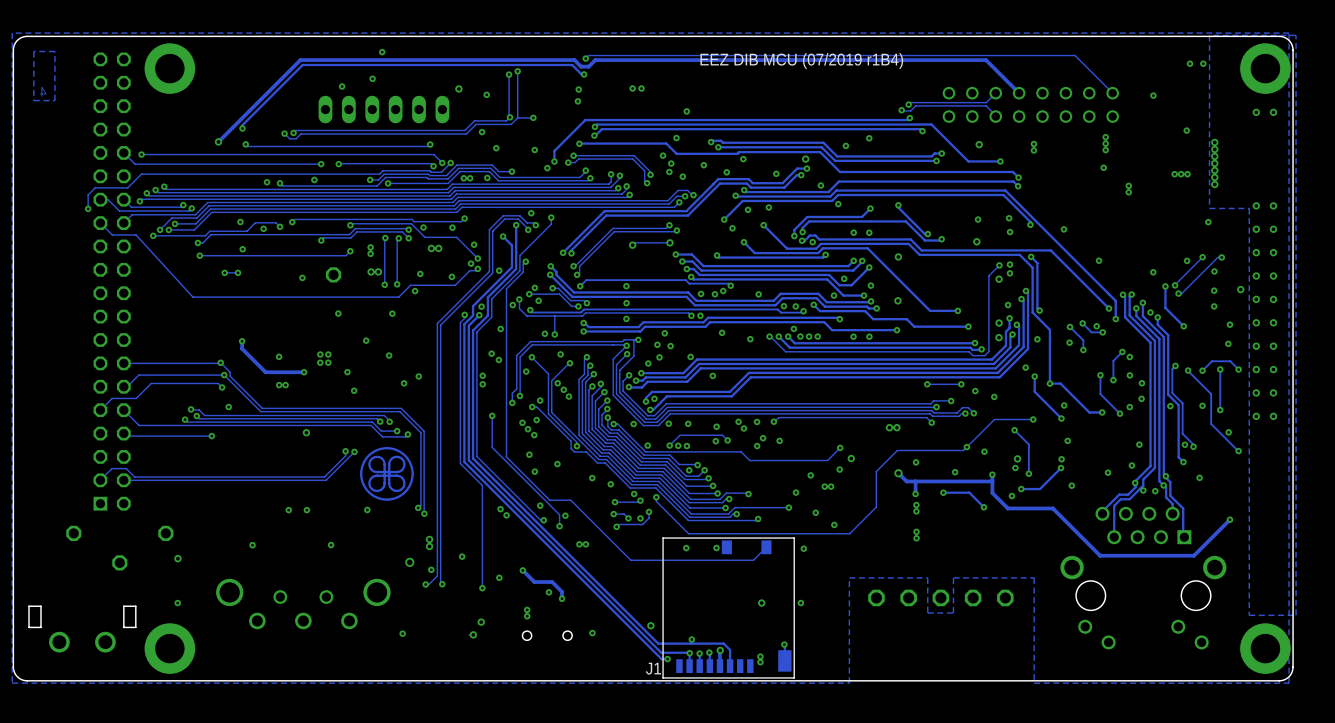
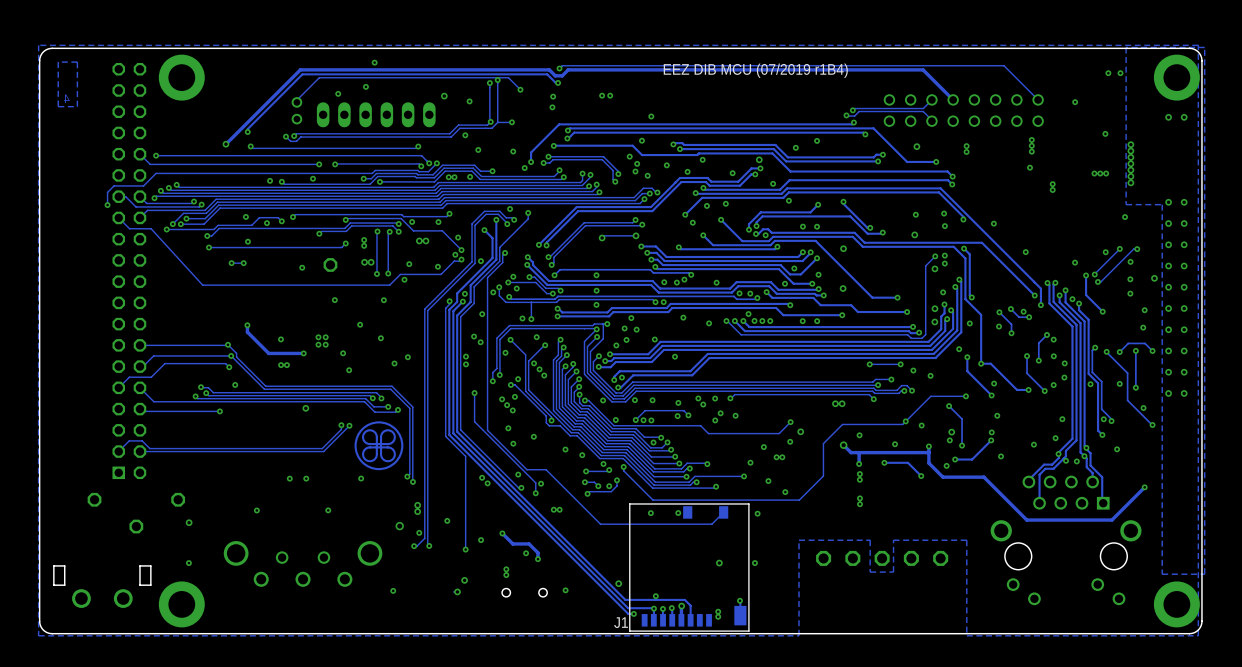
track: none -> (520, 89) (508, 77) (319, 77) (296, 100) (296, 102)
via: none -> (520, 89)
part: none -> (296, 110)

